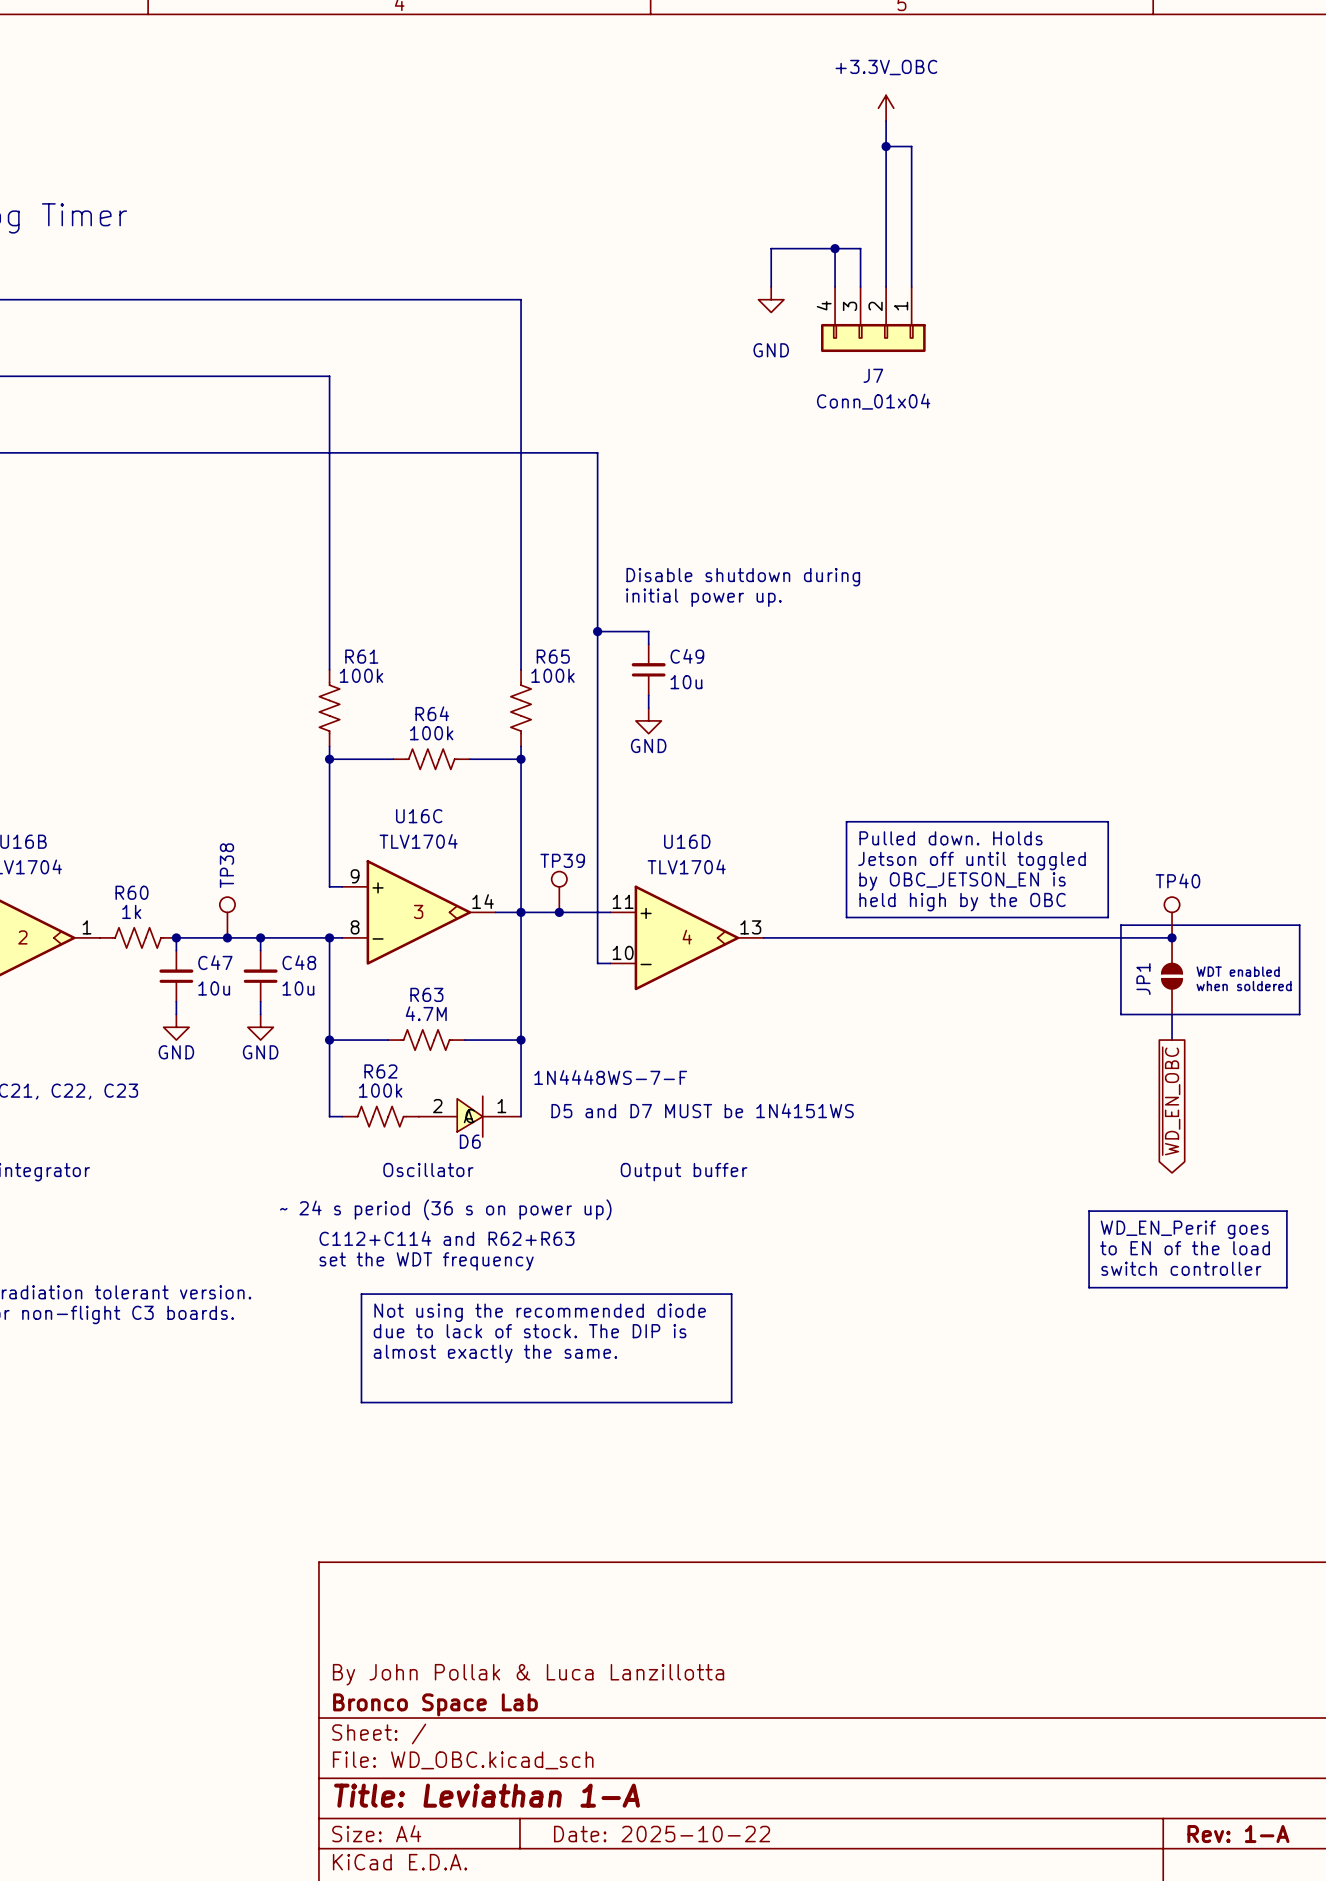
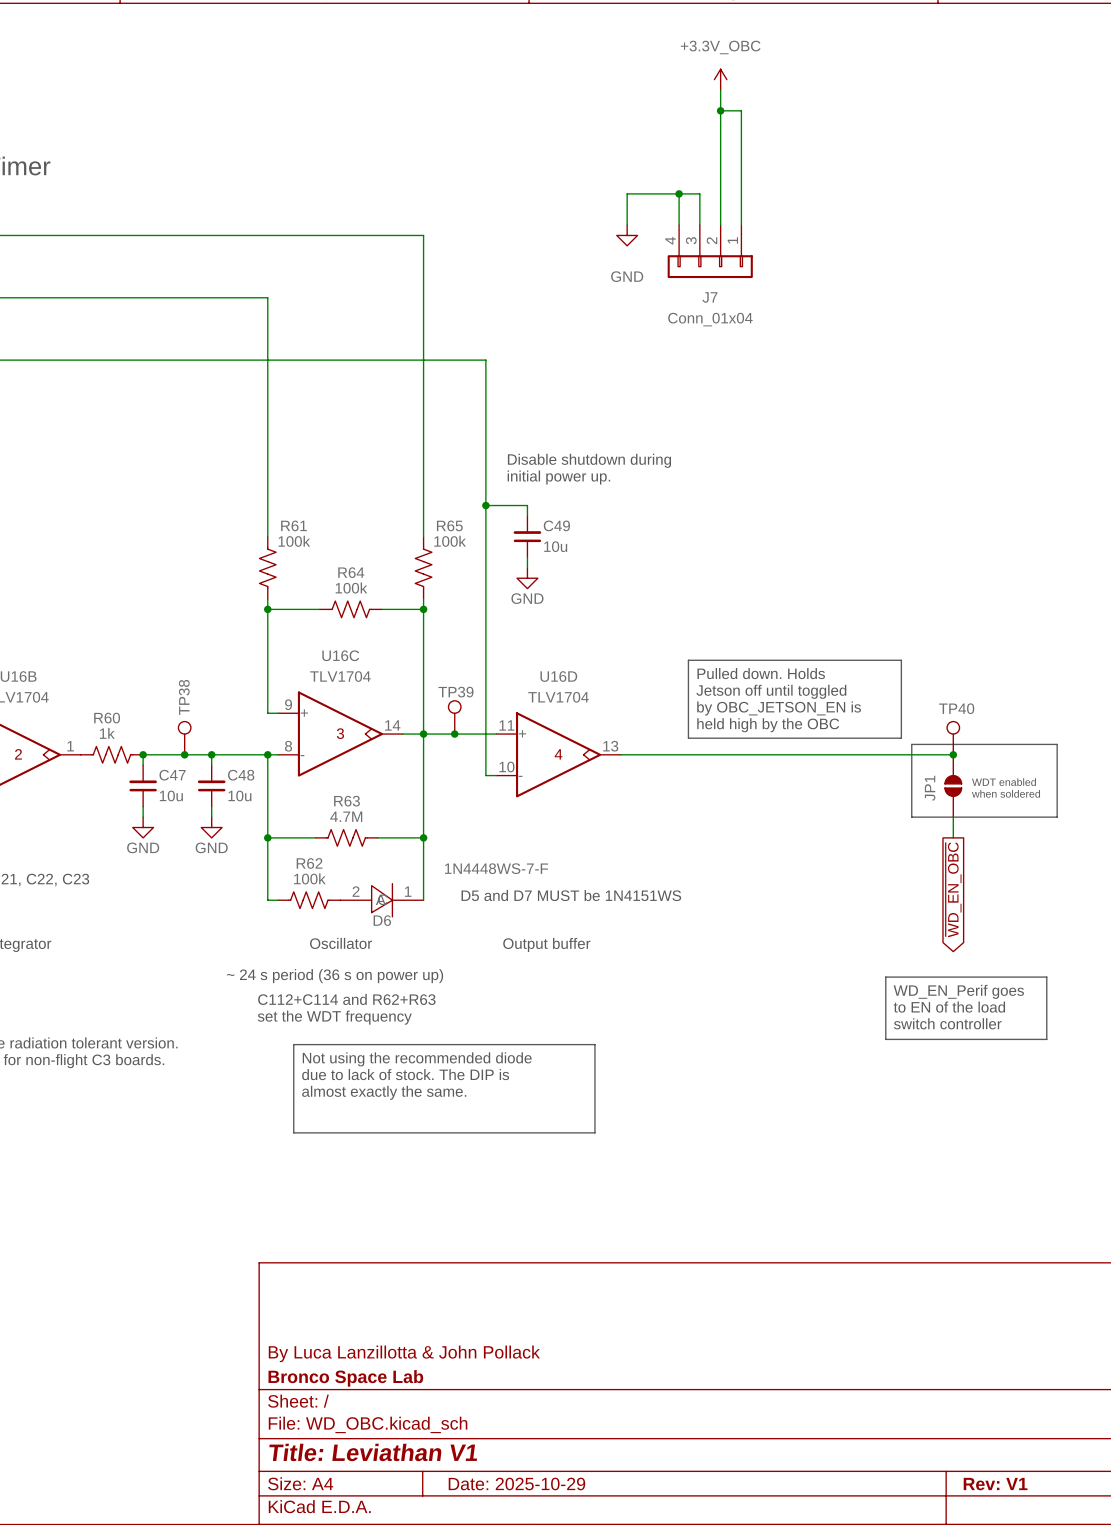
title block: By John Pollak & Luca Lanzillotta (528, 1674) -> By Luca Lanzillotta & John Pollack (404, 1353)
title block: Title: Leviathan 1-A (487, 1795) -> Title: Leviathan V1 (373, 1452)
title block: Date: 2025-10-22 (662, 1834) -> Date: 2025-10-29 (516, 1483)
title block: Rev: 1-A (1238, 1834) -> Rev: V1 (995, 1484)

